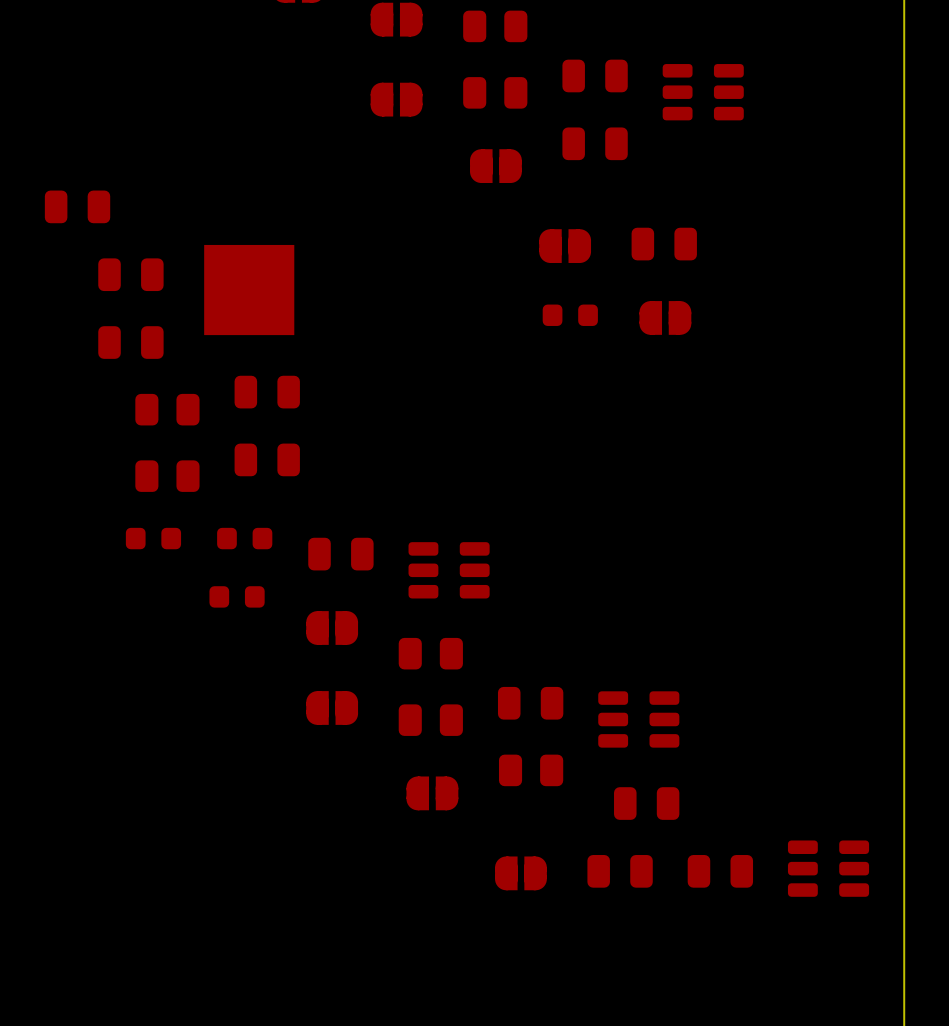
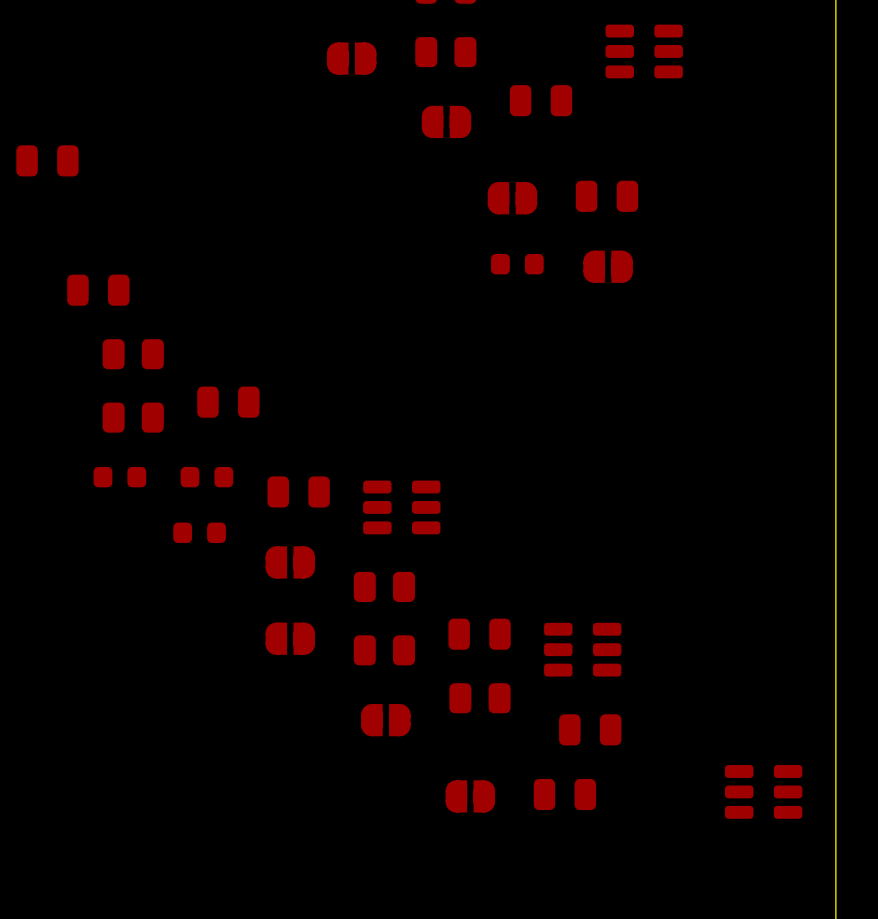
part: (595, 75) -> none
part: (130, 274) -> none
part: (249, 290) -> none
part: (267, 392) -> none
part: (720, 871) -> none

